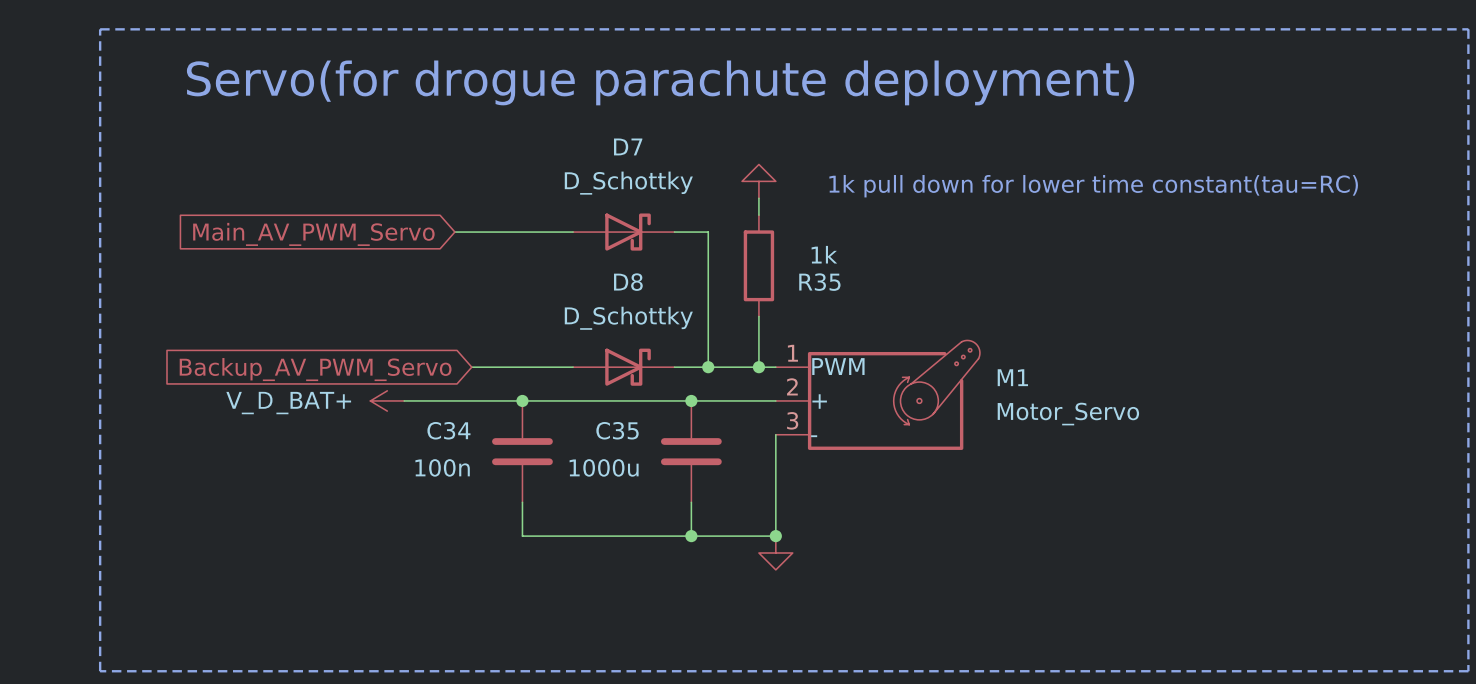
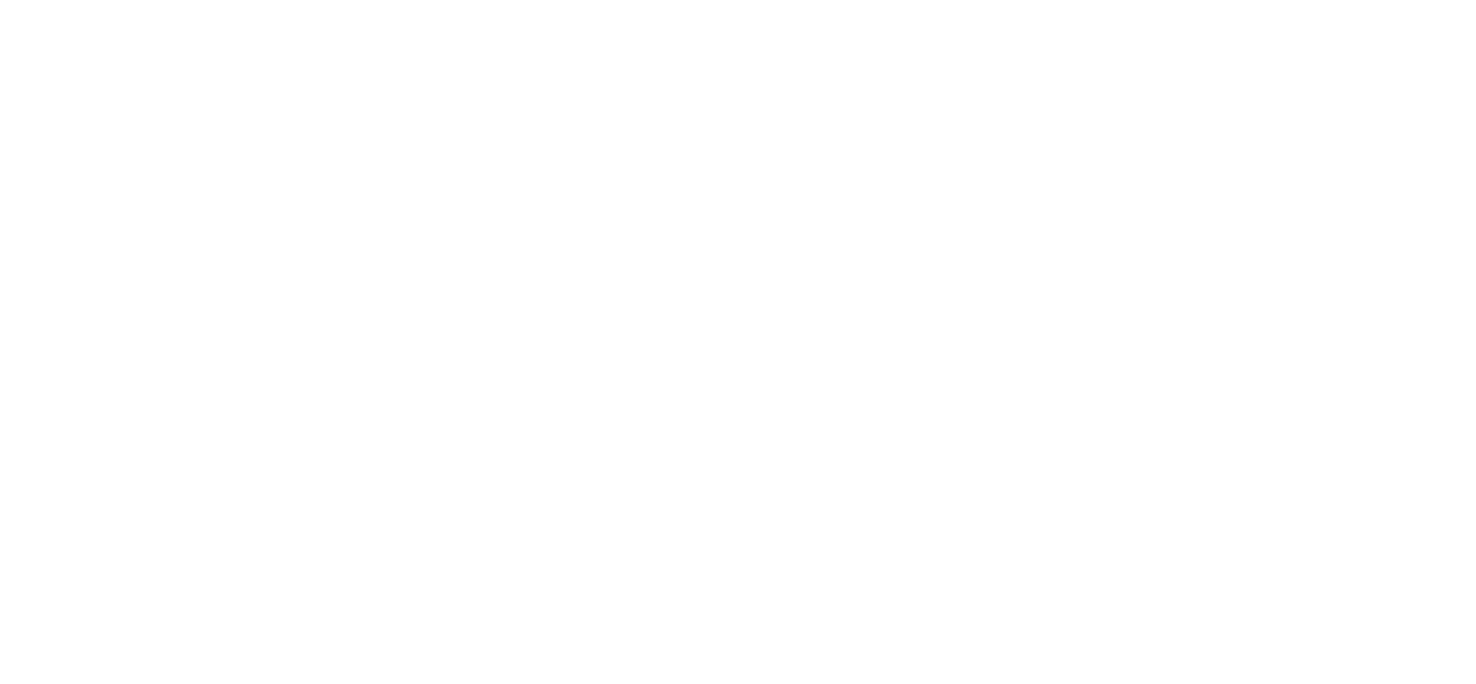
line: (100, 29) (1468, 29) (1468, 671) (100, 671) (100, 29) -> none
text: Servo(for drogue parachute deployment) (660, 82) -> none
power symbol: (758, 181) -> none
text: 1k pull down for lower time constant(tau=RC) (1093, 186) -> none
wire: (758, 198) (758, 215) -> none
wire: (454, 232) (573, 232) -> none
D7: D_Schottky (623, 232) -> none
wire: (674, 232) (708, 232) (708, 367) -> none
global label: Main_AV_PWM_Servo (313, 234) -> none
R35: 1k (758, 265) -> none
wire: (758, 316) (758, 367) -> none
wire: (471, 367) (573, 367) -> none
D8: D_Schottky (623, 367) -> none
wire: (674, 367) (775, 367) -> none
junction: (708, 367) -> none
junction: (758, 367) -> none
global label: Backup_AV_PWM_Servo (315, 369) -> none
M1: Motor_Servo (877, 395) -> none
power symbol: V_Ｄ_BAT+ (387, 400) -> none
wire: (404, 400) (775, 400) -> none
junction: (522, 400) -> none
junction: (691, 400) -> none
wire: (775, 434) (775, 536) (522, 536) (522, 502) -> none
C34: 100n (522, 451) -> none
C35: 1000u (691, 451) -> none
wire: (691, 502) (691, 536) -> none
junction: (691, 536) -> none
junction: (775, 536) -> none
power symbol: (775, 552) -> none

